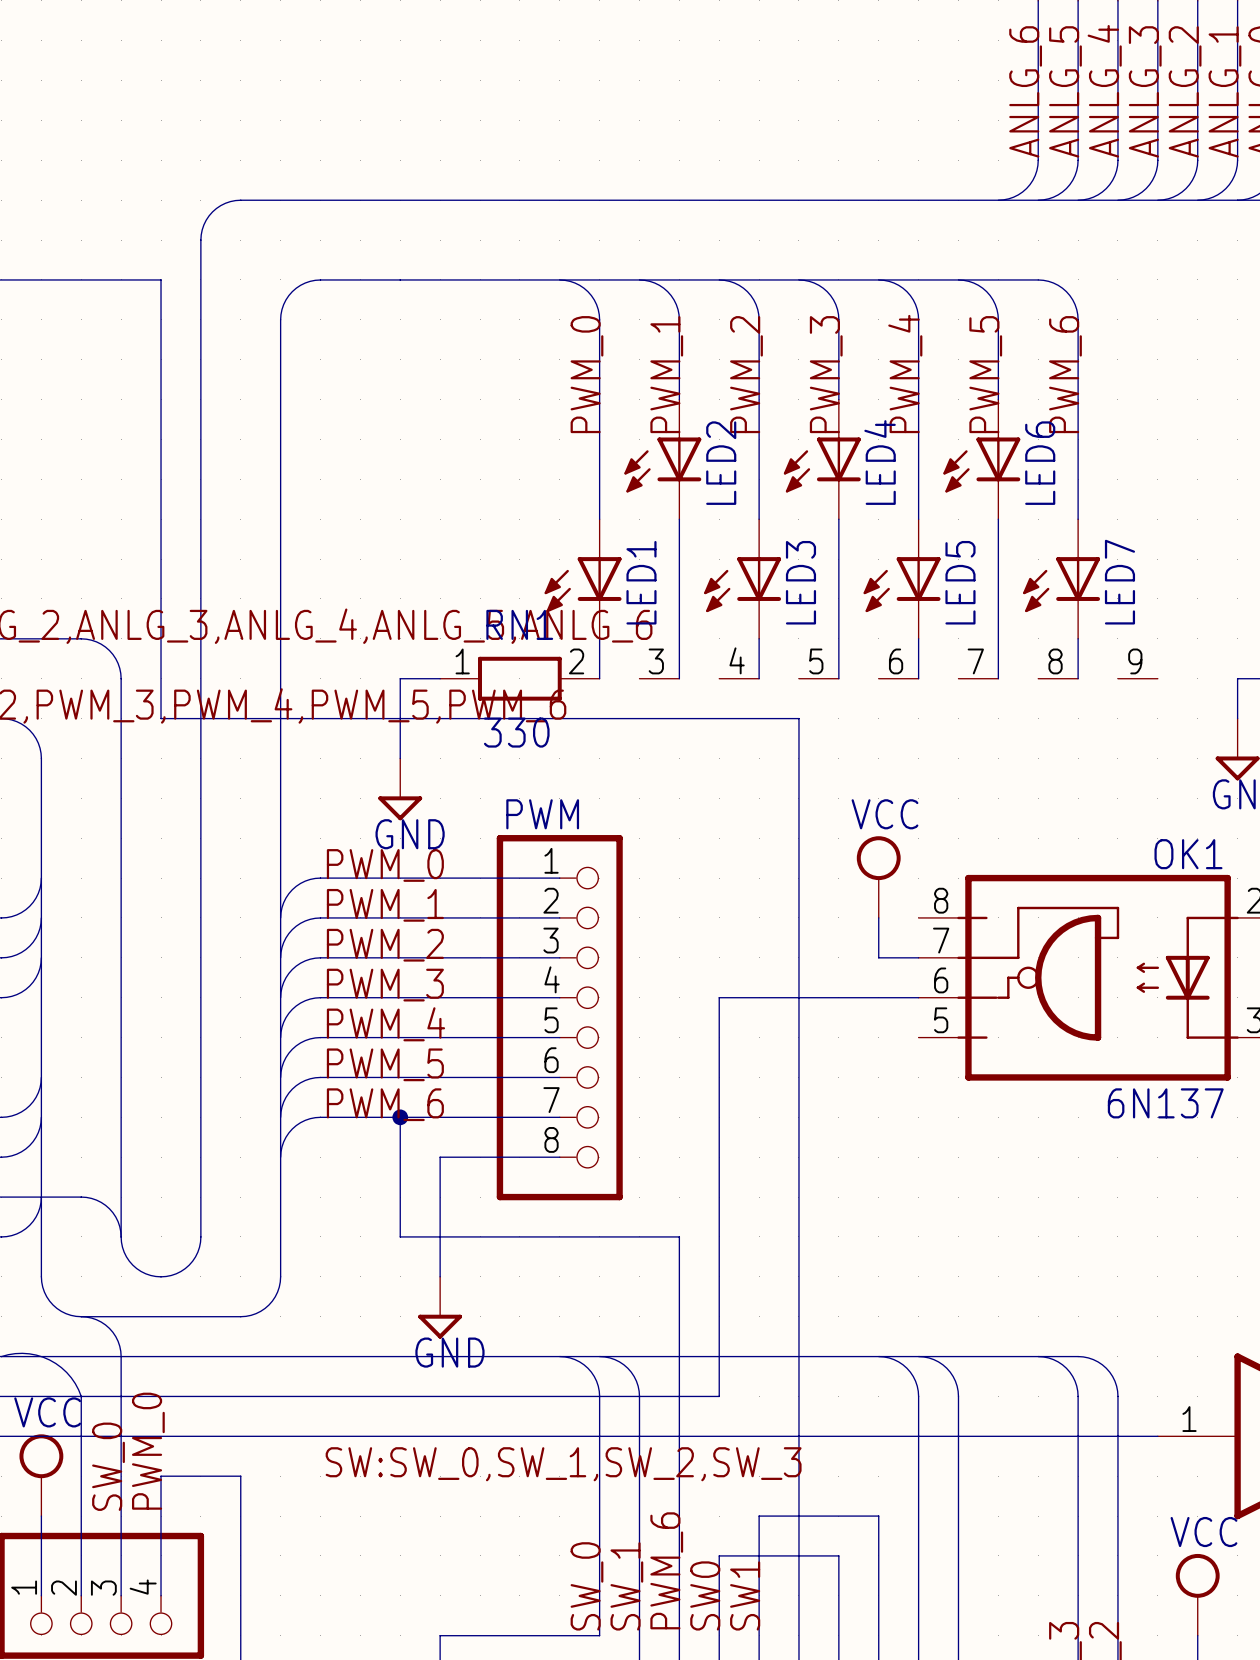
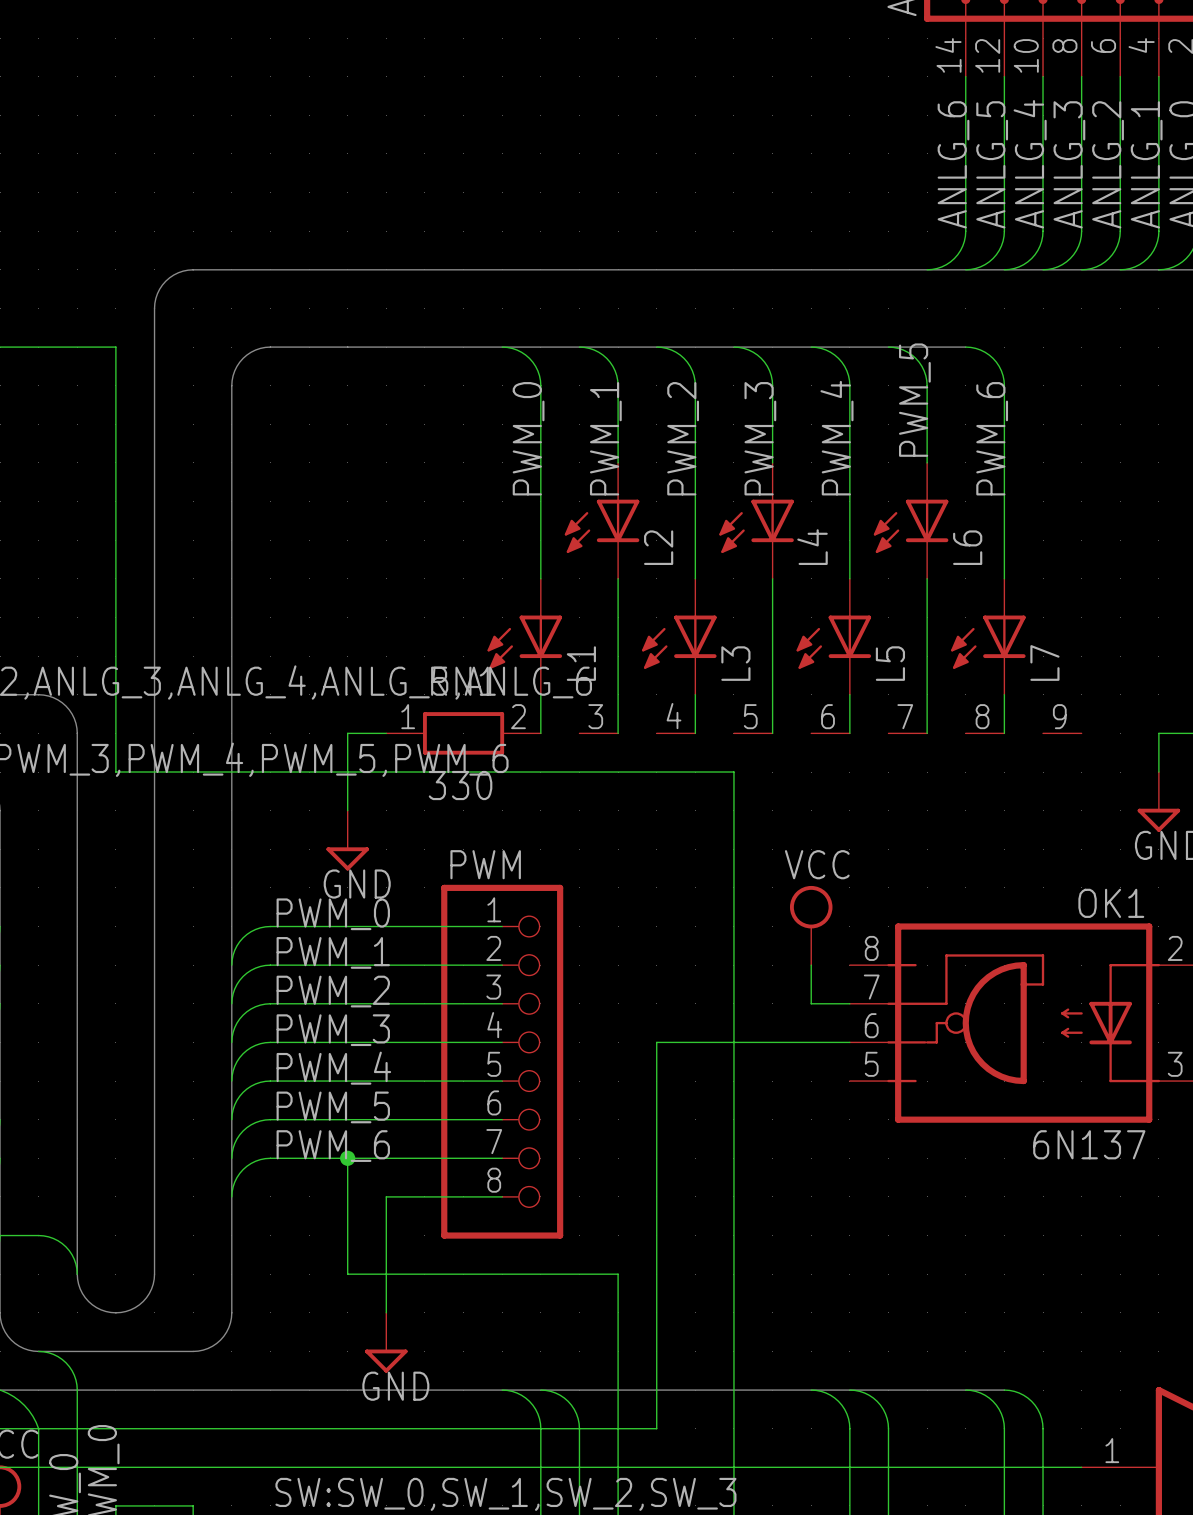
label position: PWM_5 (985, 374) -> PWM_5 (914, 400)
LED4 name: LED4 (880, 462) -> L4 (812, 547)
LED2 name: LED2 (721, 463) -> L2 (658, 547)
LED6 name: LED6 (1040, 463) -> L6 (967, 547)
LED1 name: LED1 (641, 582) -> L1 (581, 663)
LED3 name: LED3 (800, 582) -> L3 (735, 663)
LED5 name: LED5 (960, 582) -> L5 (890, 663)
LED7 name: LED7 (1119, 582) -> L7 (1044, 662)

